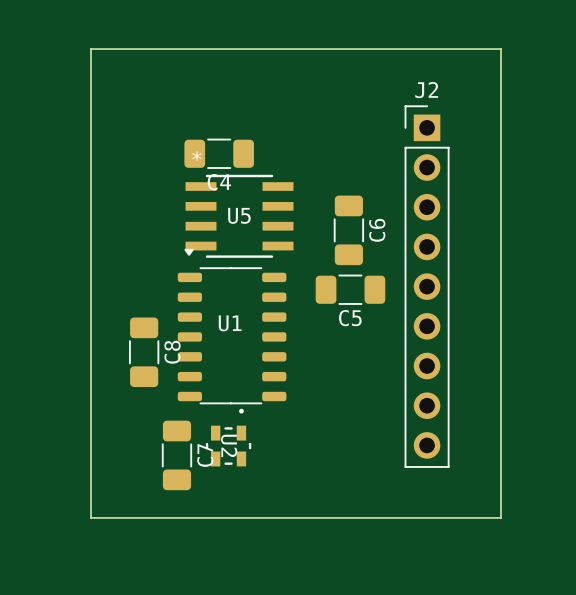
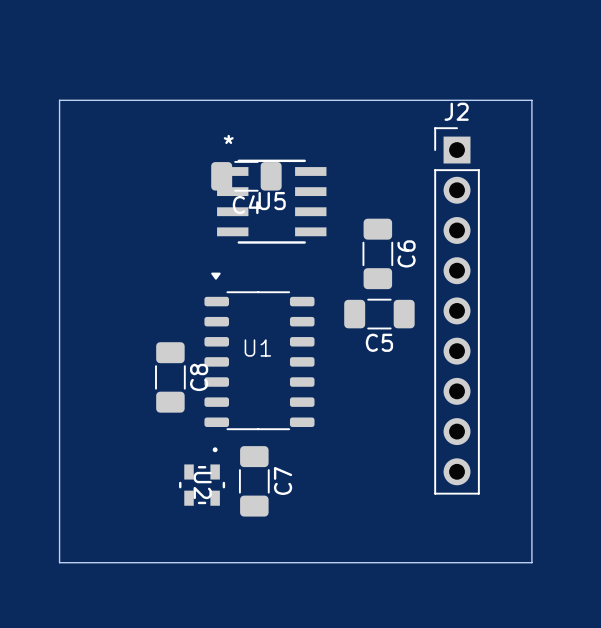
board edge: (500, 78) (500, 49) (91, 49) (91, 517) (500, 517) -> (531, 100) (59, 100) (59, 562) (531, 562) (531, 545)
U5 position: (239, 216) -> (271, 201)
U2 position: (228, 437) -> (202, 476)
C7 position: (176, 455) -> (254, 481)

